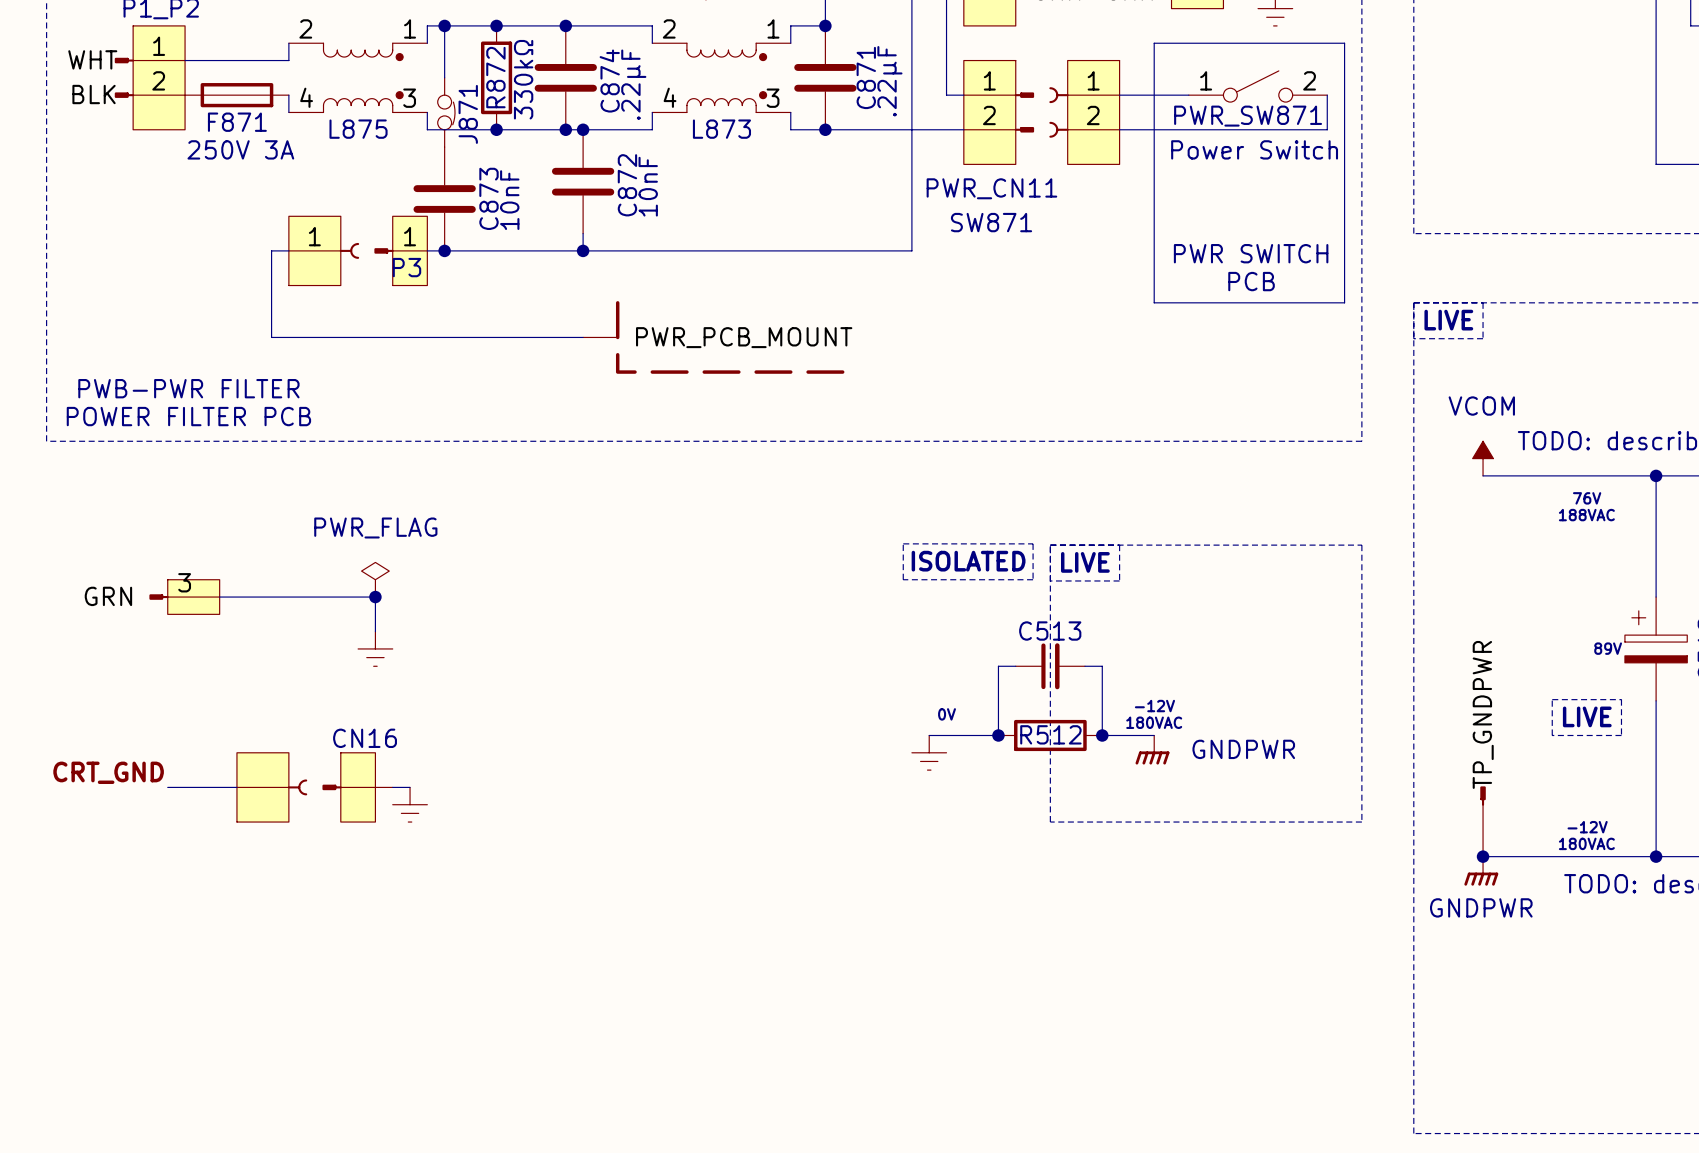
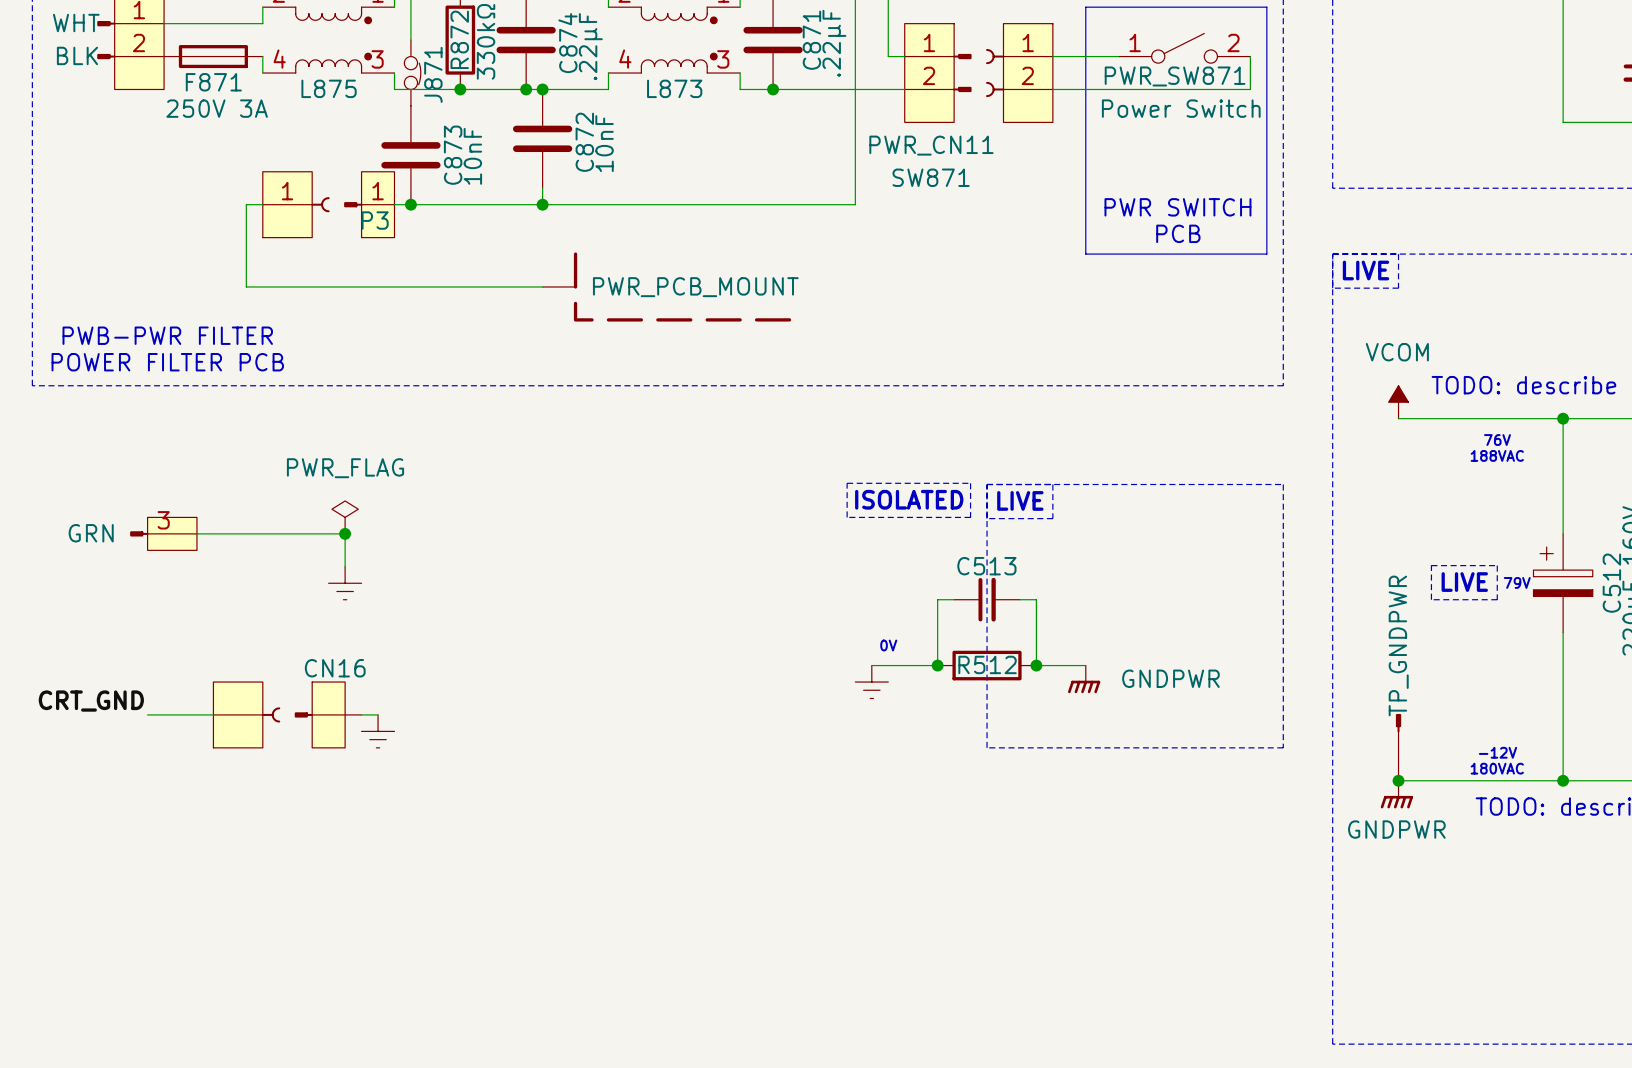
text: 89V (1608, 648) -> 79V (1517, 582)
line: (1552, 699) (1621, 699) (1621, 735) (1552, 735) (1552, 699) -> (1431, 565) (1497, 565) (1497, 599) (1431, 599) (1431, 565)
text: -12V (1154, 706) -> none
text position: LIVE (1587, 716) -> LIVE (1464, 582)
text: 180VAC (1154, 722) -> none

